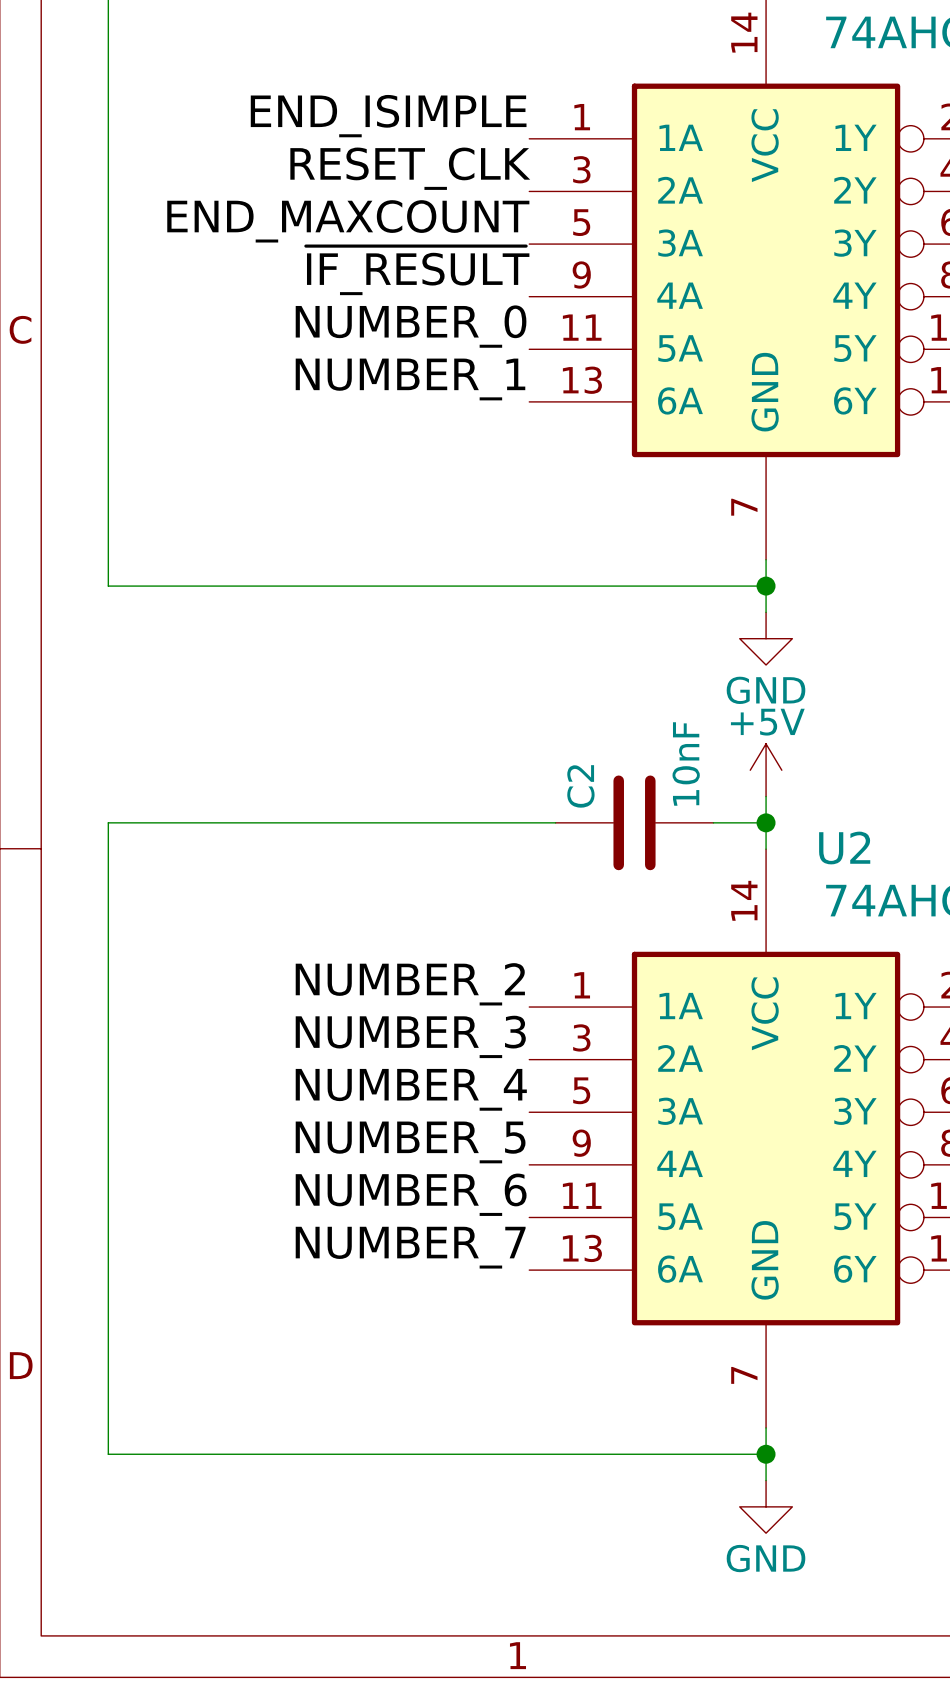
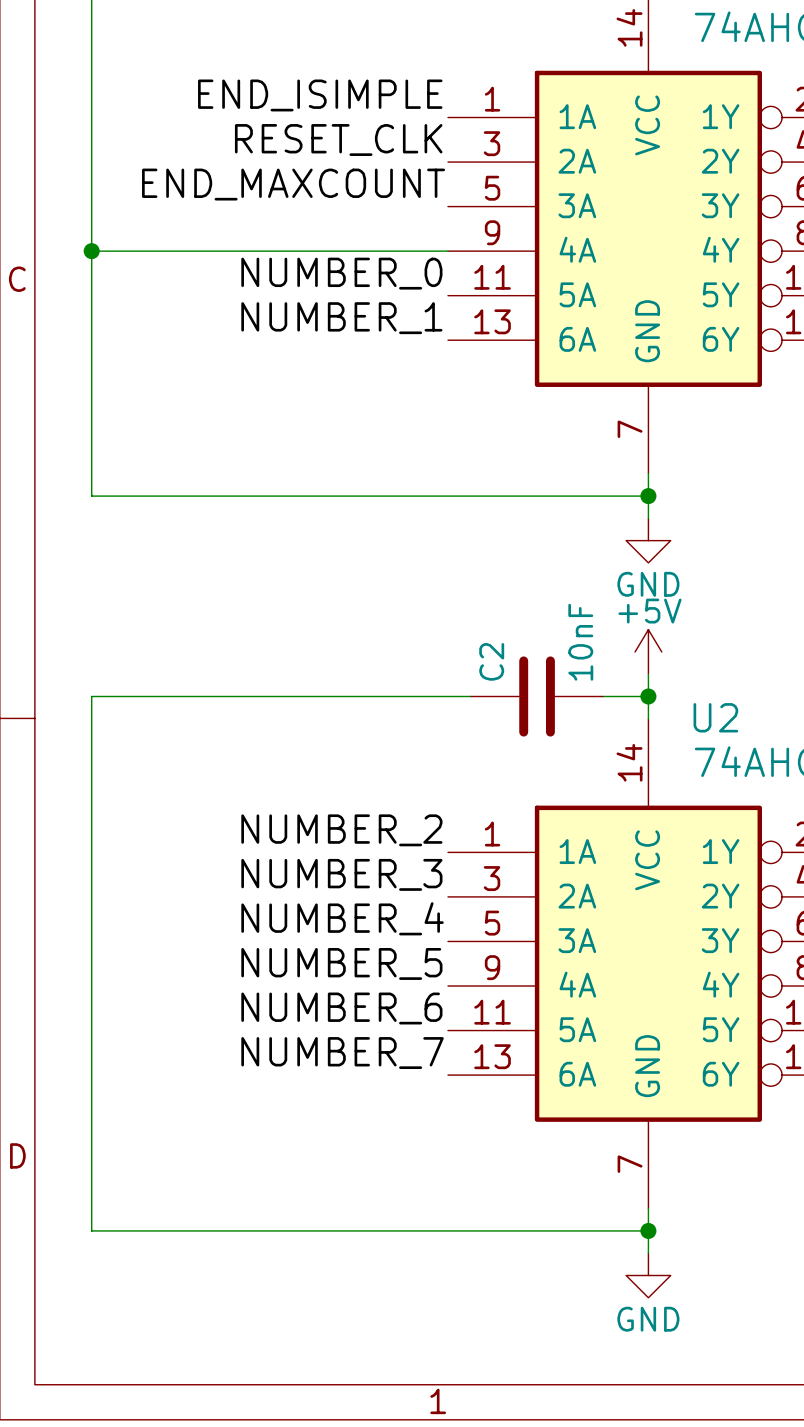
label: ~{IF_RESULT} (417, 270) -> none
wire: none -> (91, 251) (448, 251)
junction: none -> (91, 251)

